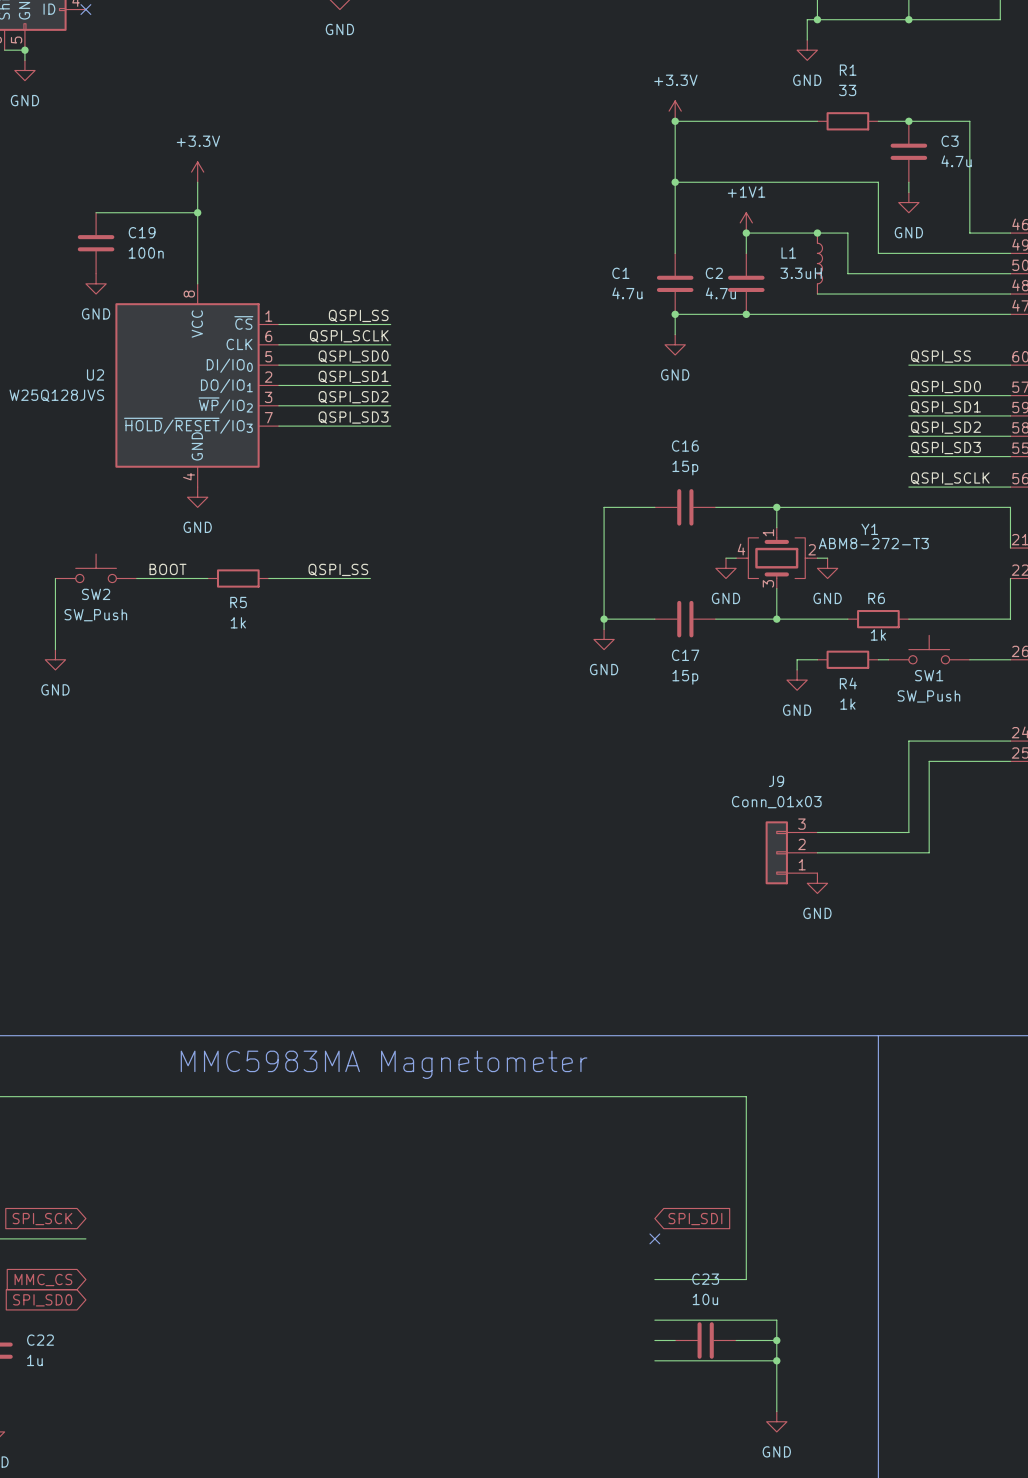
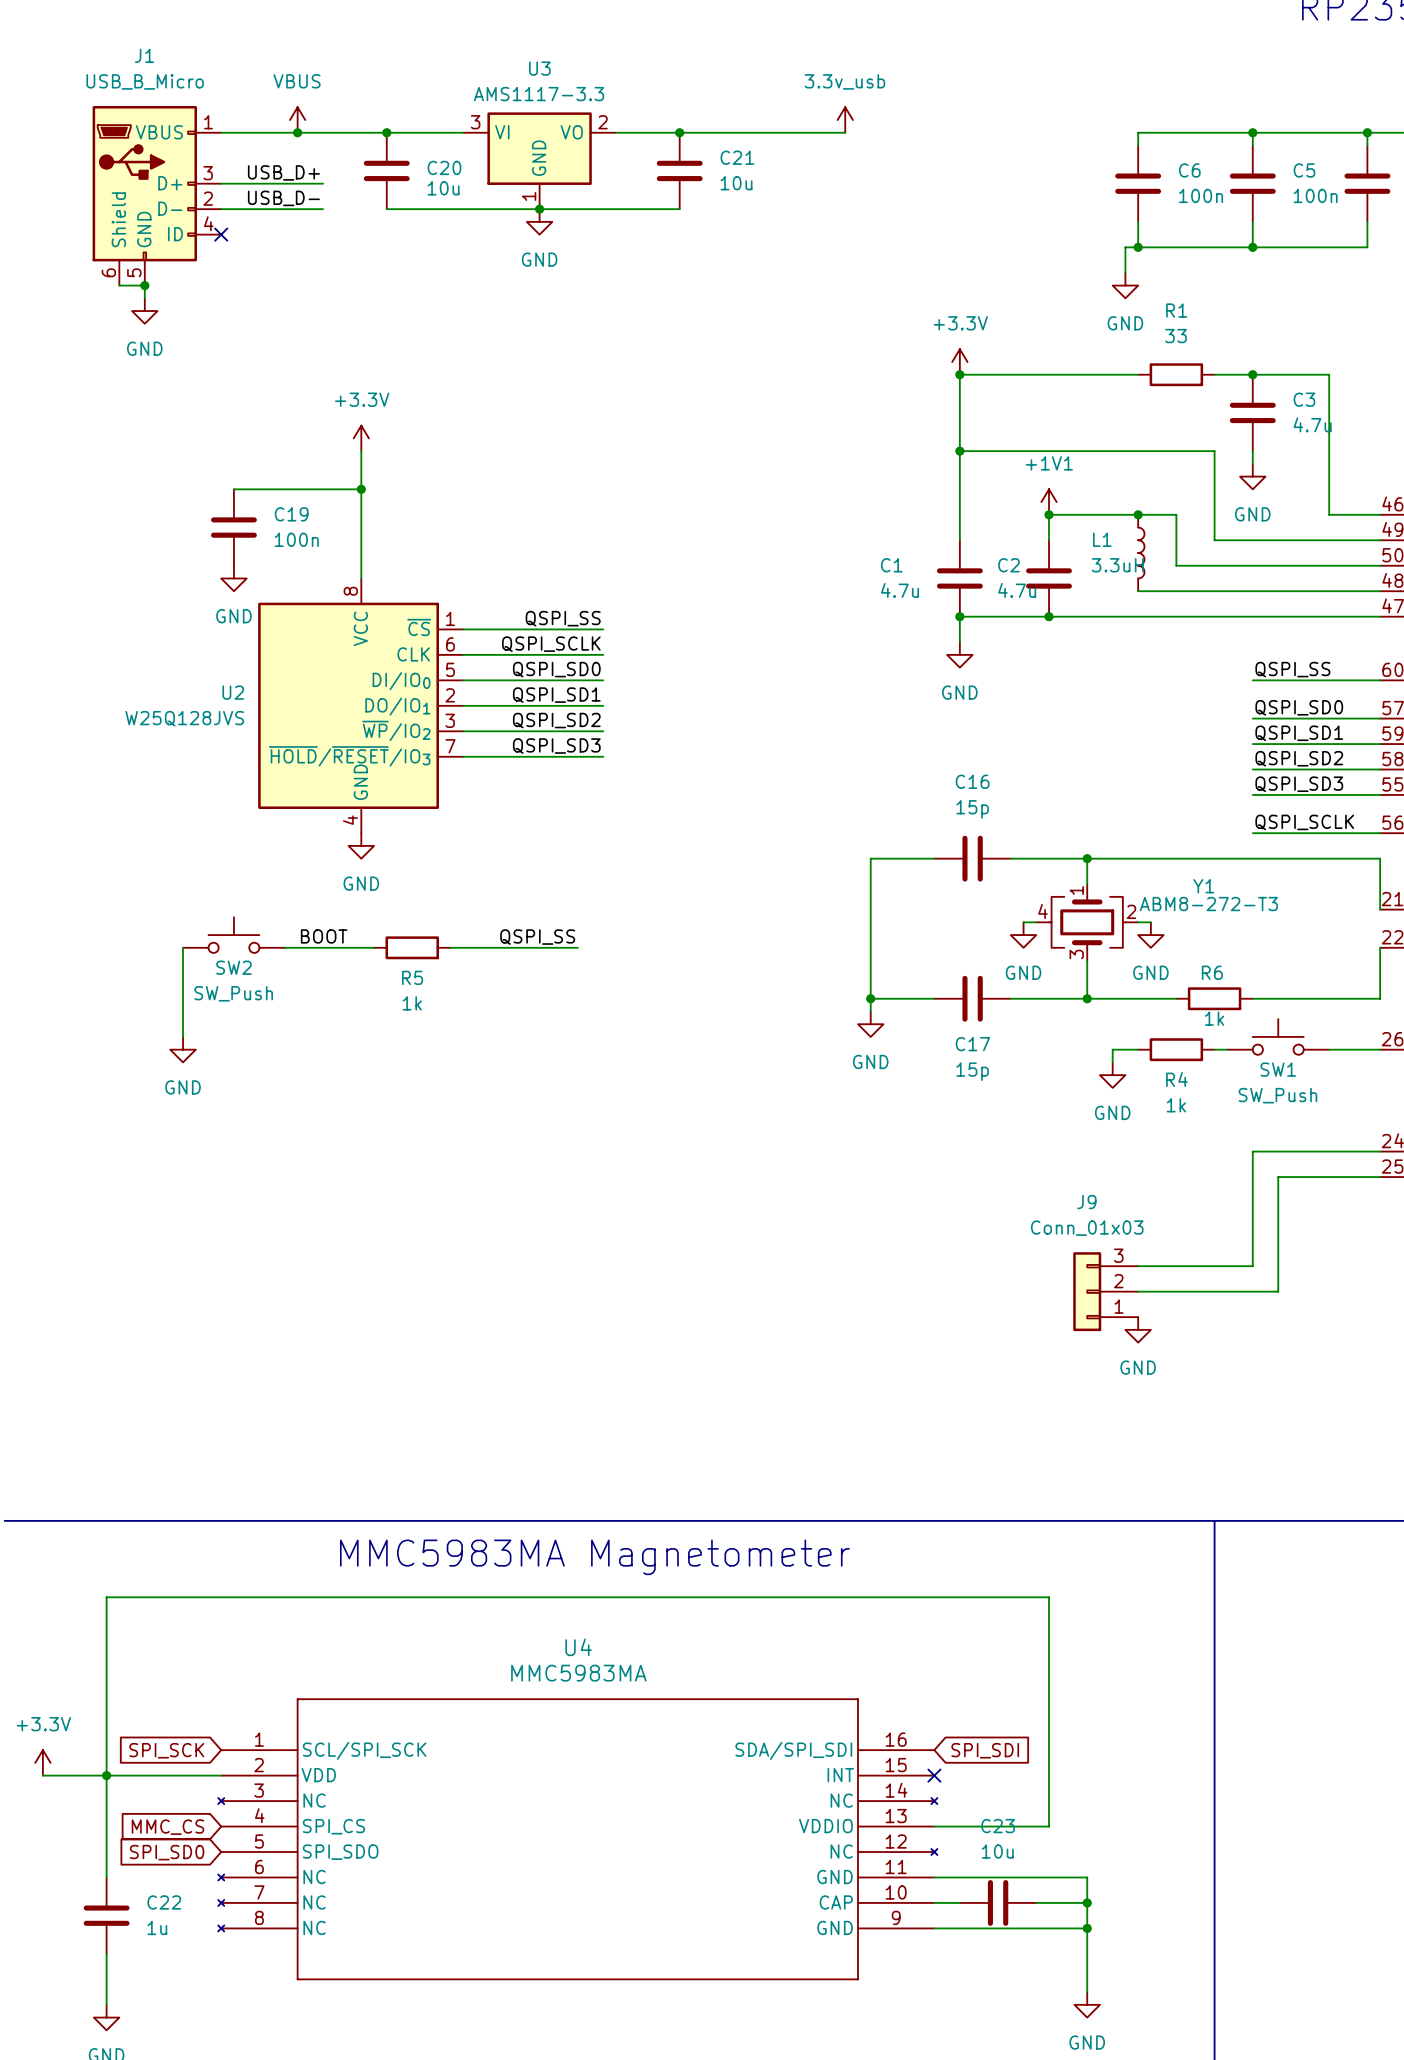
U4: none -> MMC5983MA (577, 1839)

